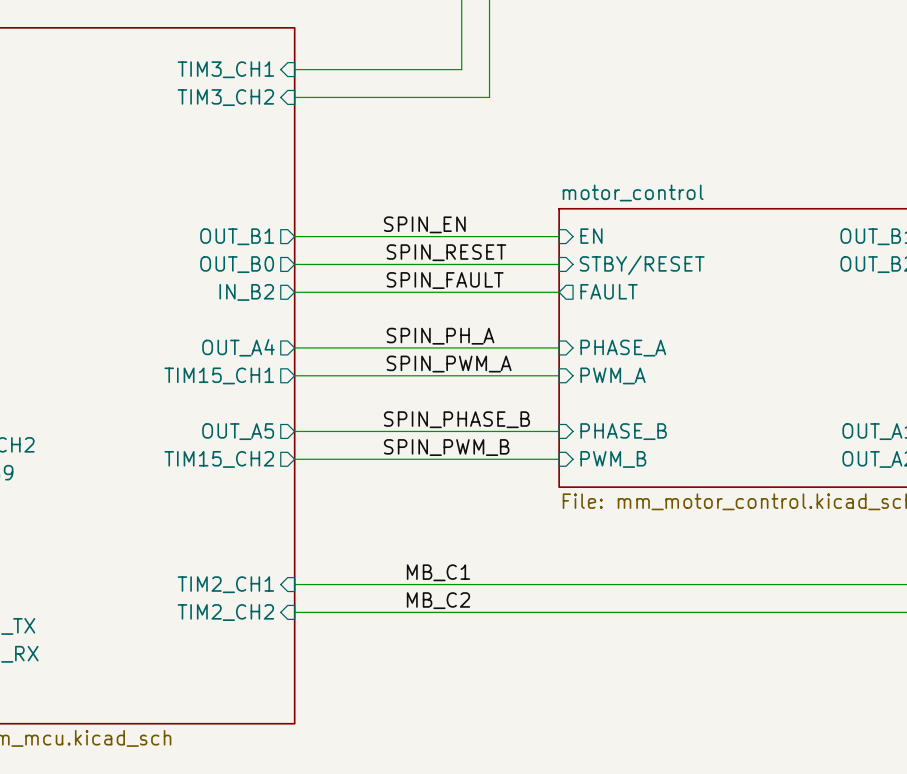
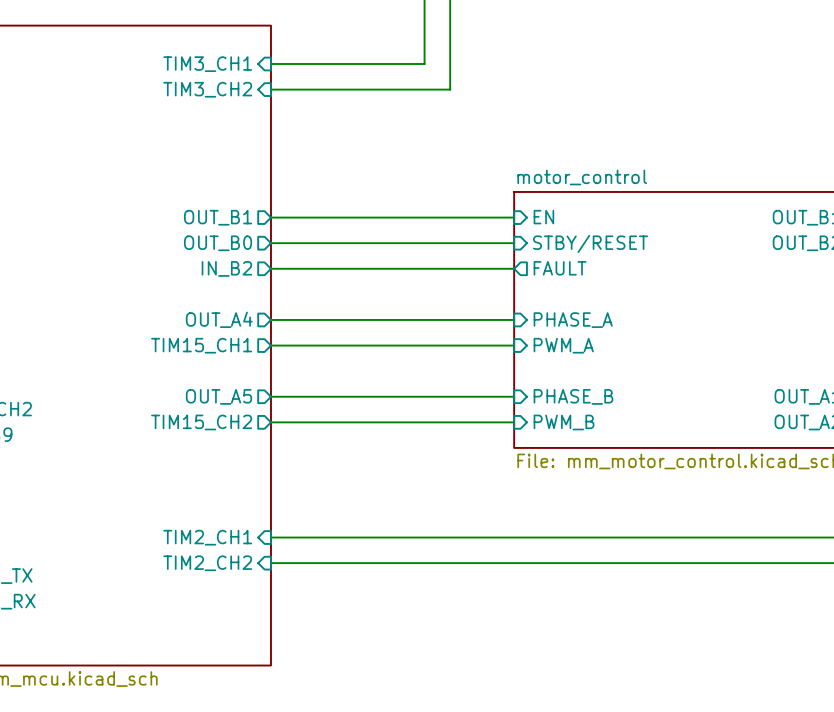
label: SPIN_EN (424, 224) -> none
label: SPIN_RESET (446, 252) -> none
label: SPIN_FAULT (445, 280) -> none
label: SPIN_PH_A (440, 336) -> none
label: SPIN_PWM_A (449, 364) -> none
label: SPIN_PHASE_B (456, 419) -> none
label: SPIN_PWM_B (446, 447) -> none
label: MB_C1 (438, 572) -> none
label: MB_C2 (438, 600) -> none

